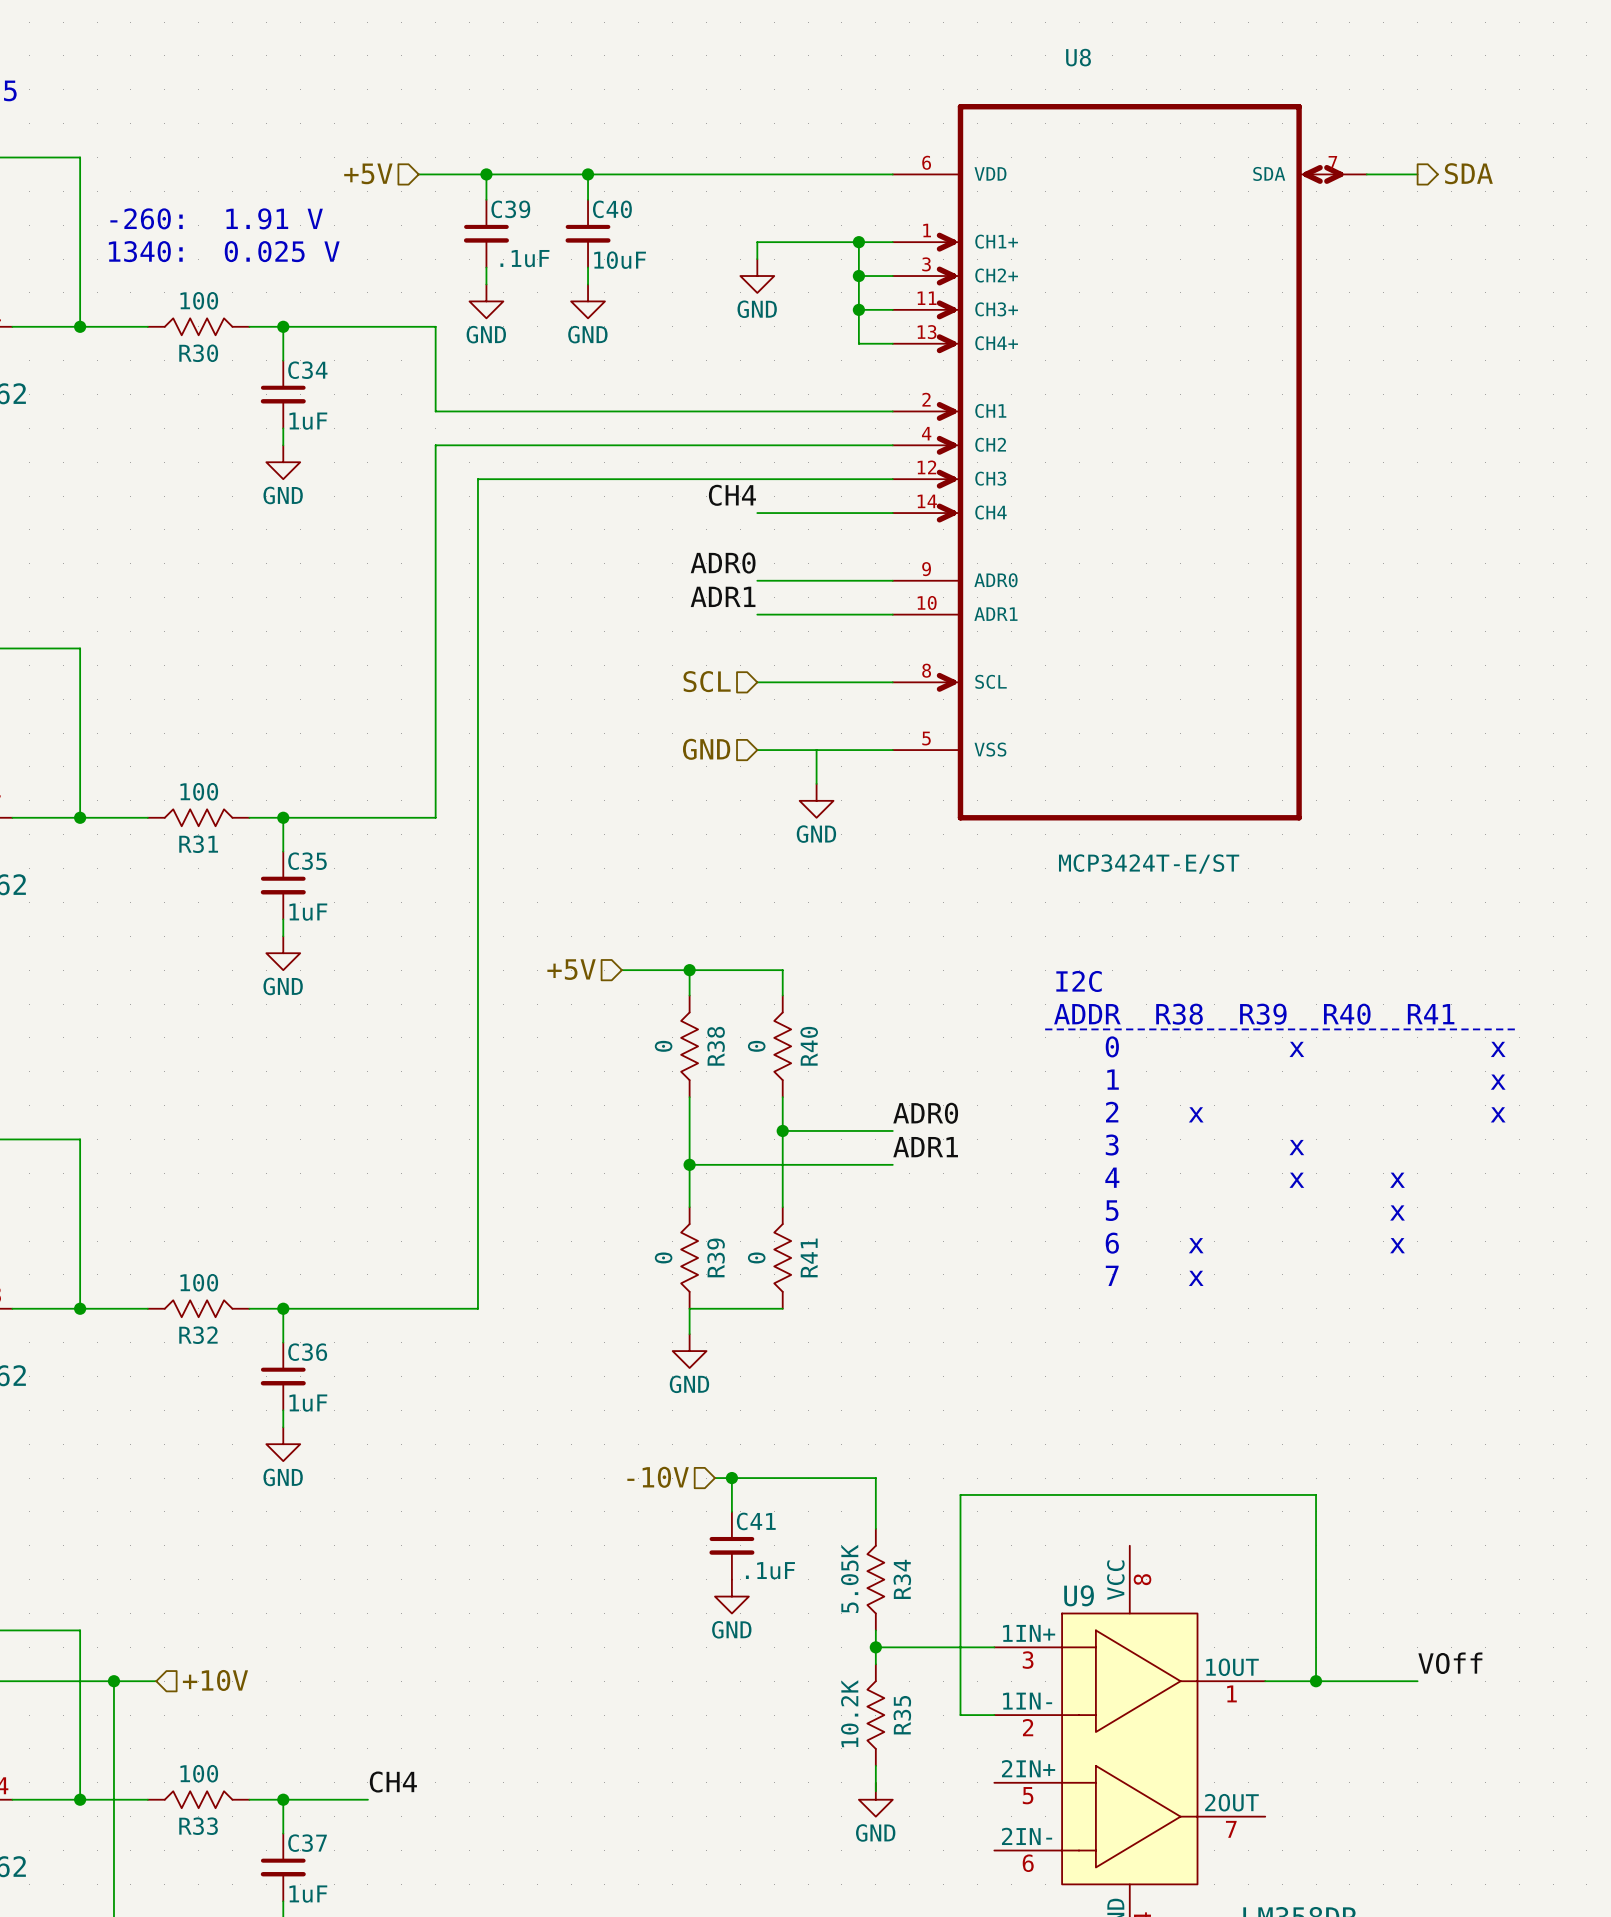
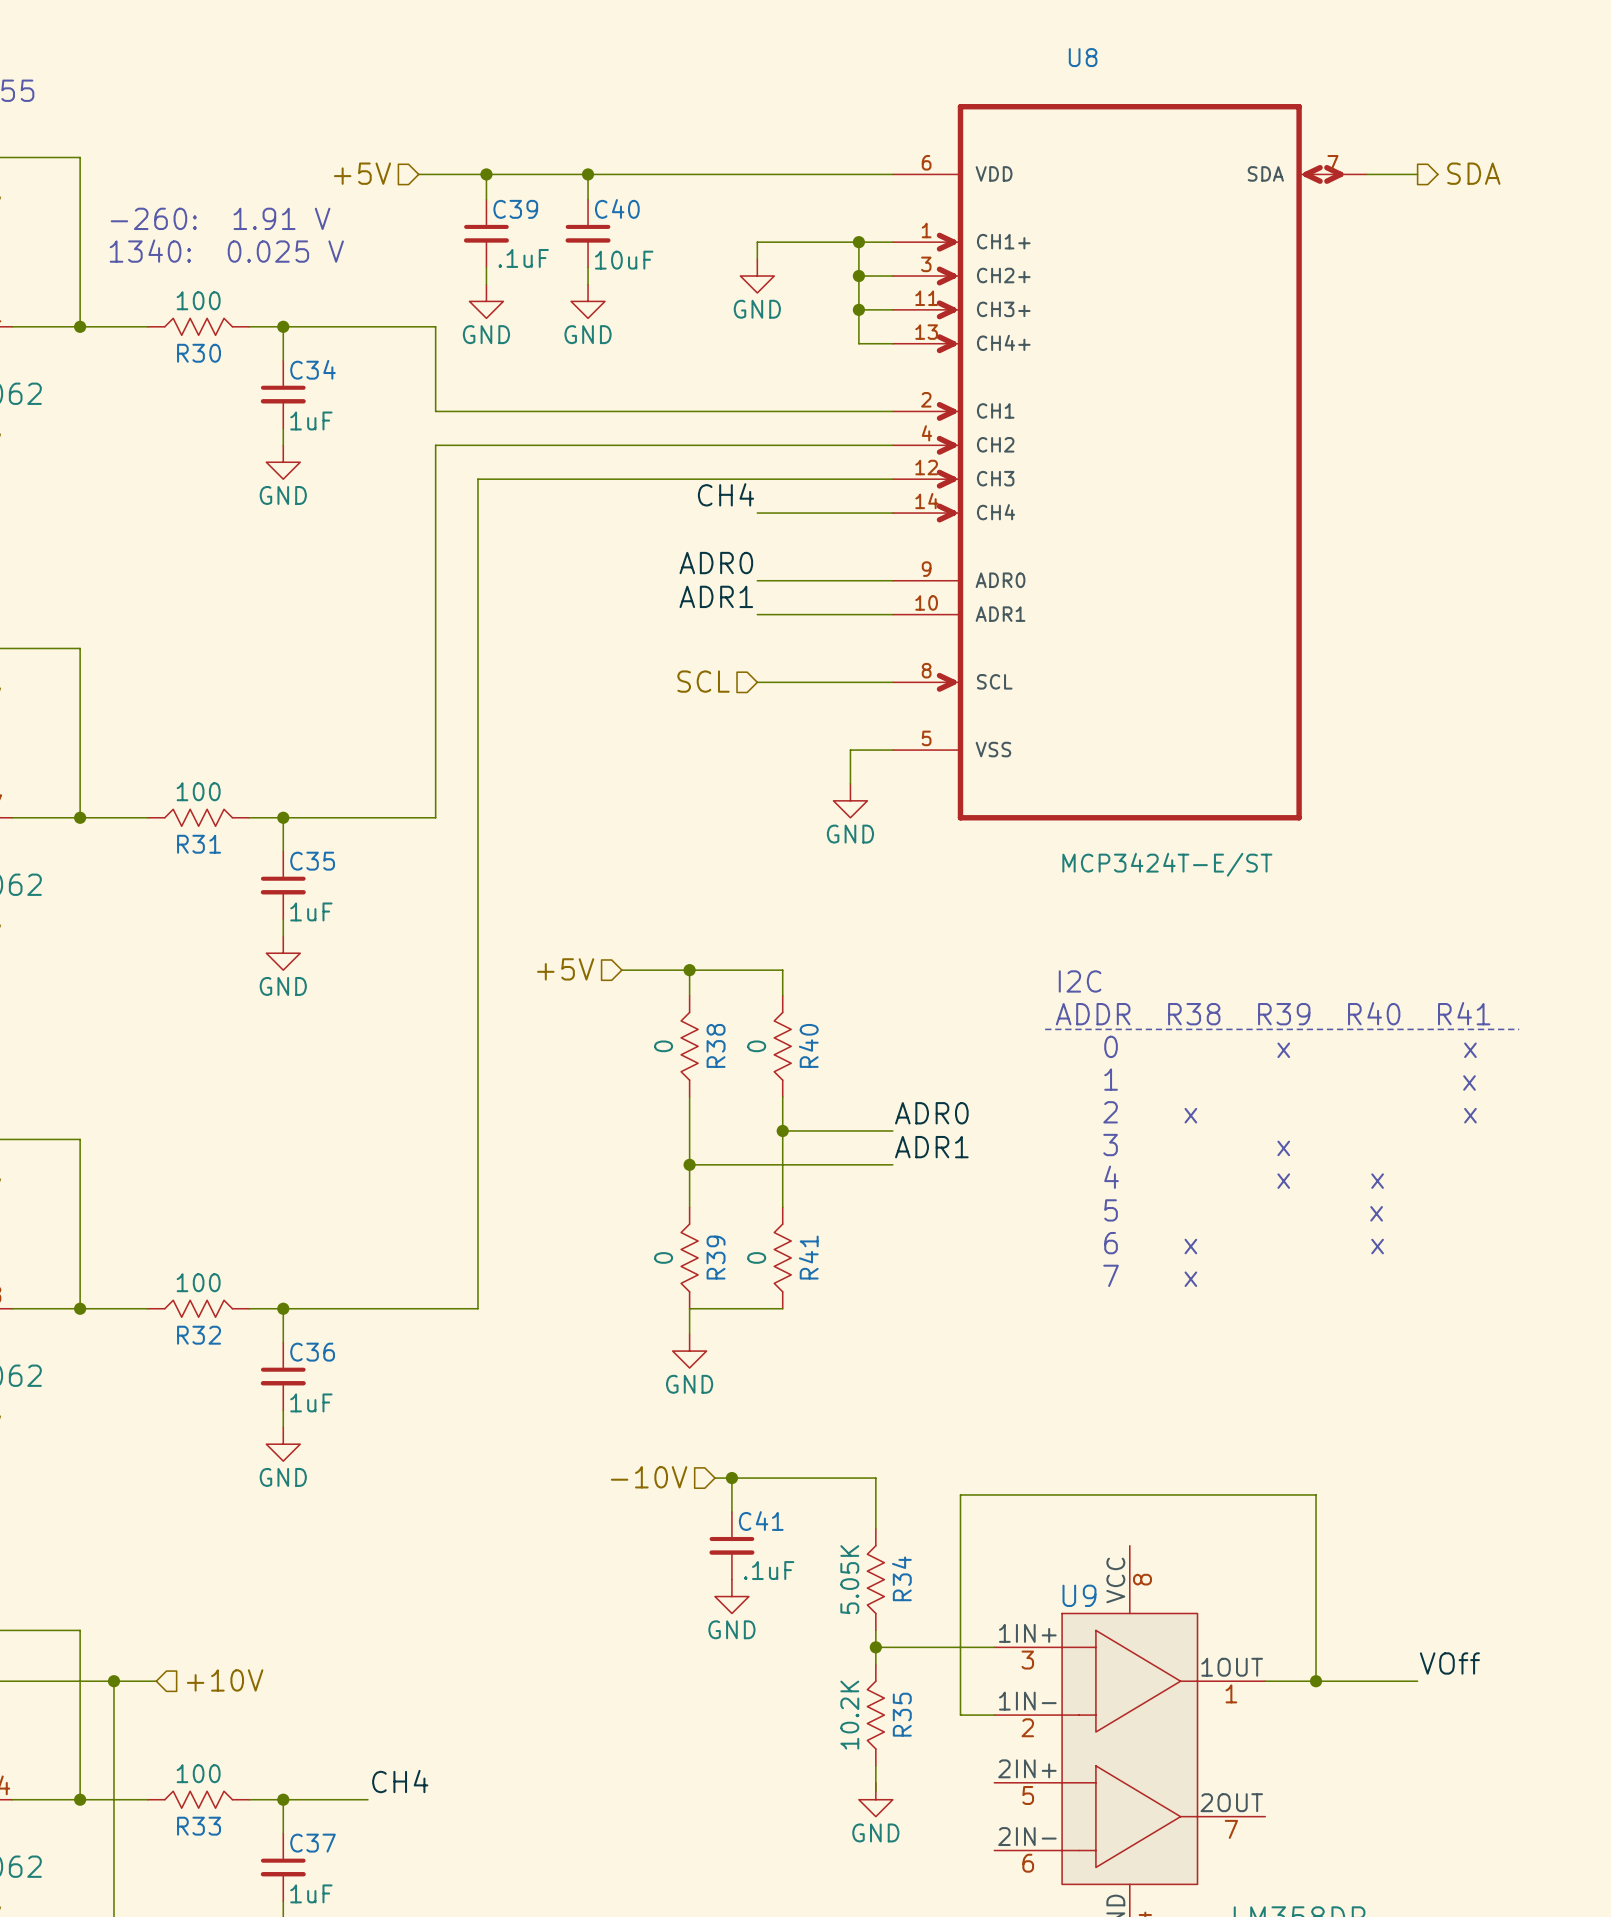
hierarchical label: GND (706, 749) -> none
wire: (757, 750) (850, 750) -> (850, 783) (850, 750)
wire: (816, 750) (816, 783) -> none
power symbol position: GND (816, 800) -> GND (850, 800)

